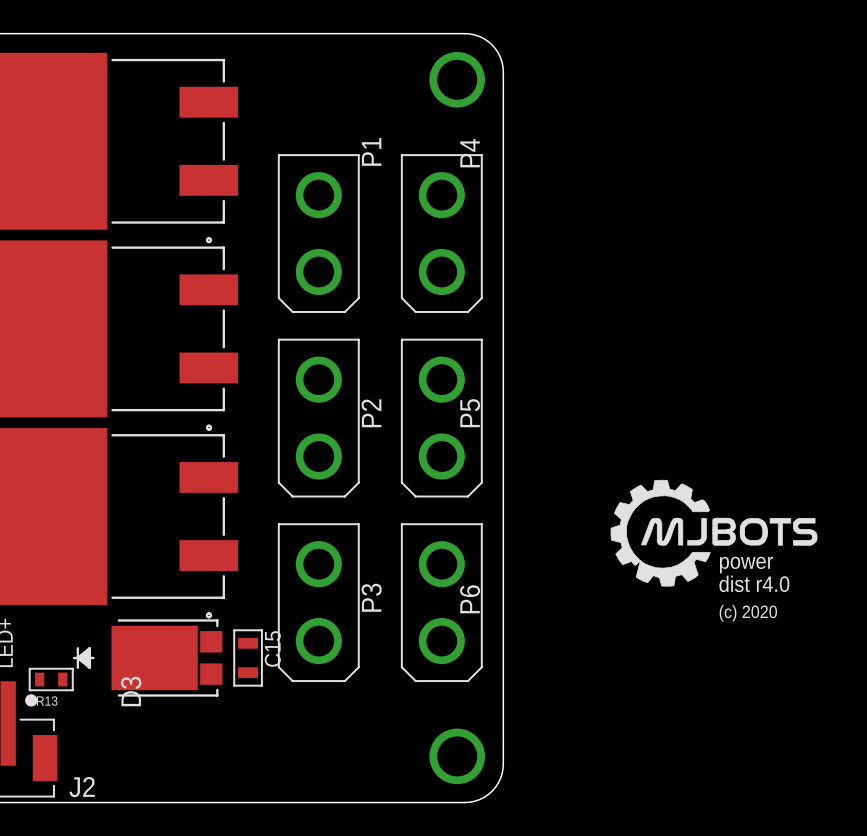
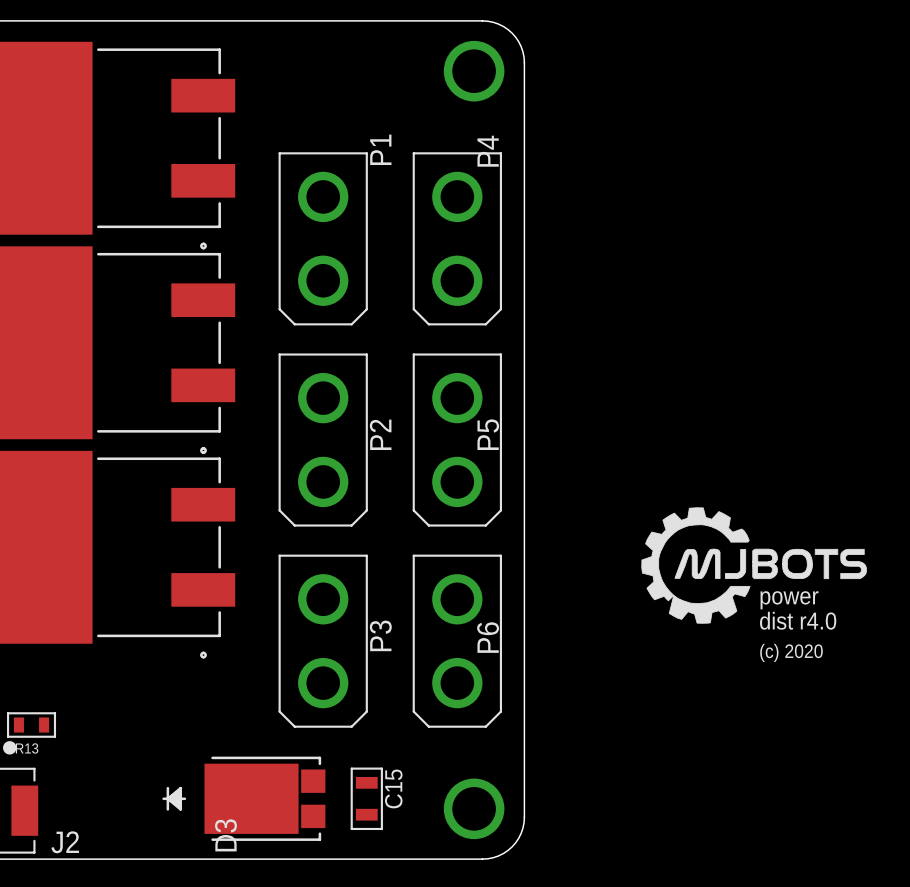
D3 position: (147, 657) -> (243, 798)
C15 position: (248, 657) -> (366, 798)

